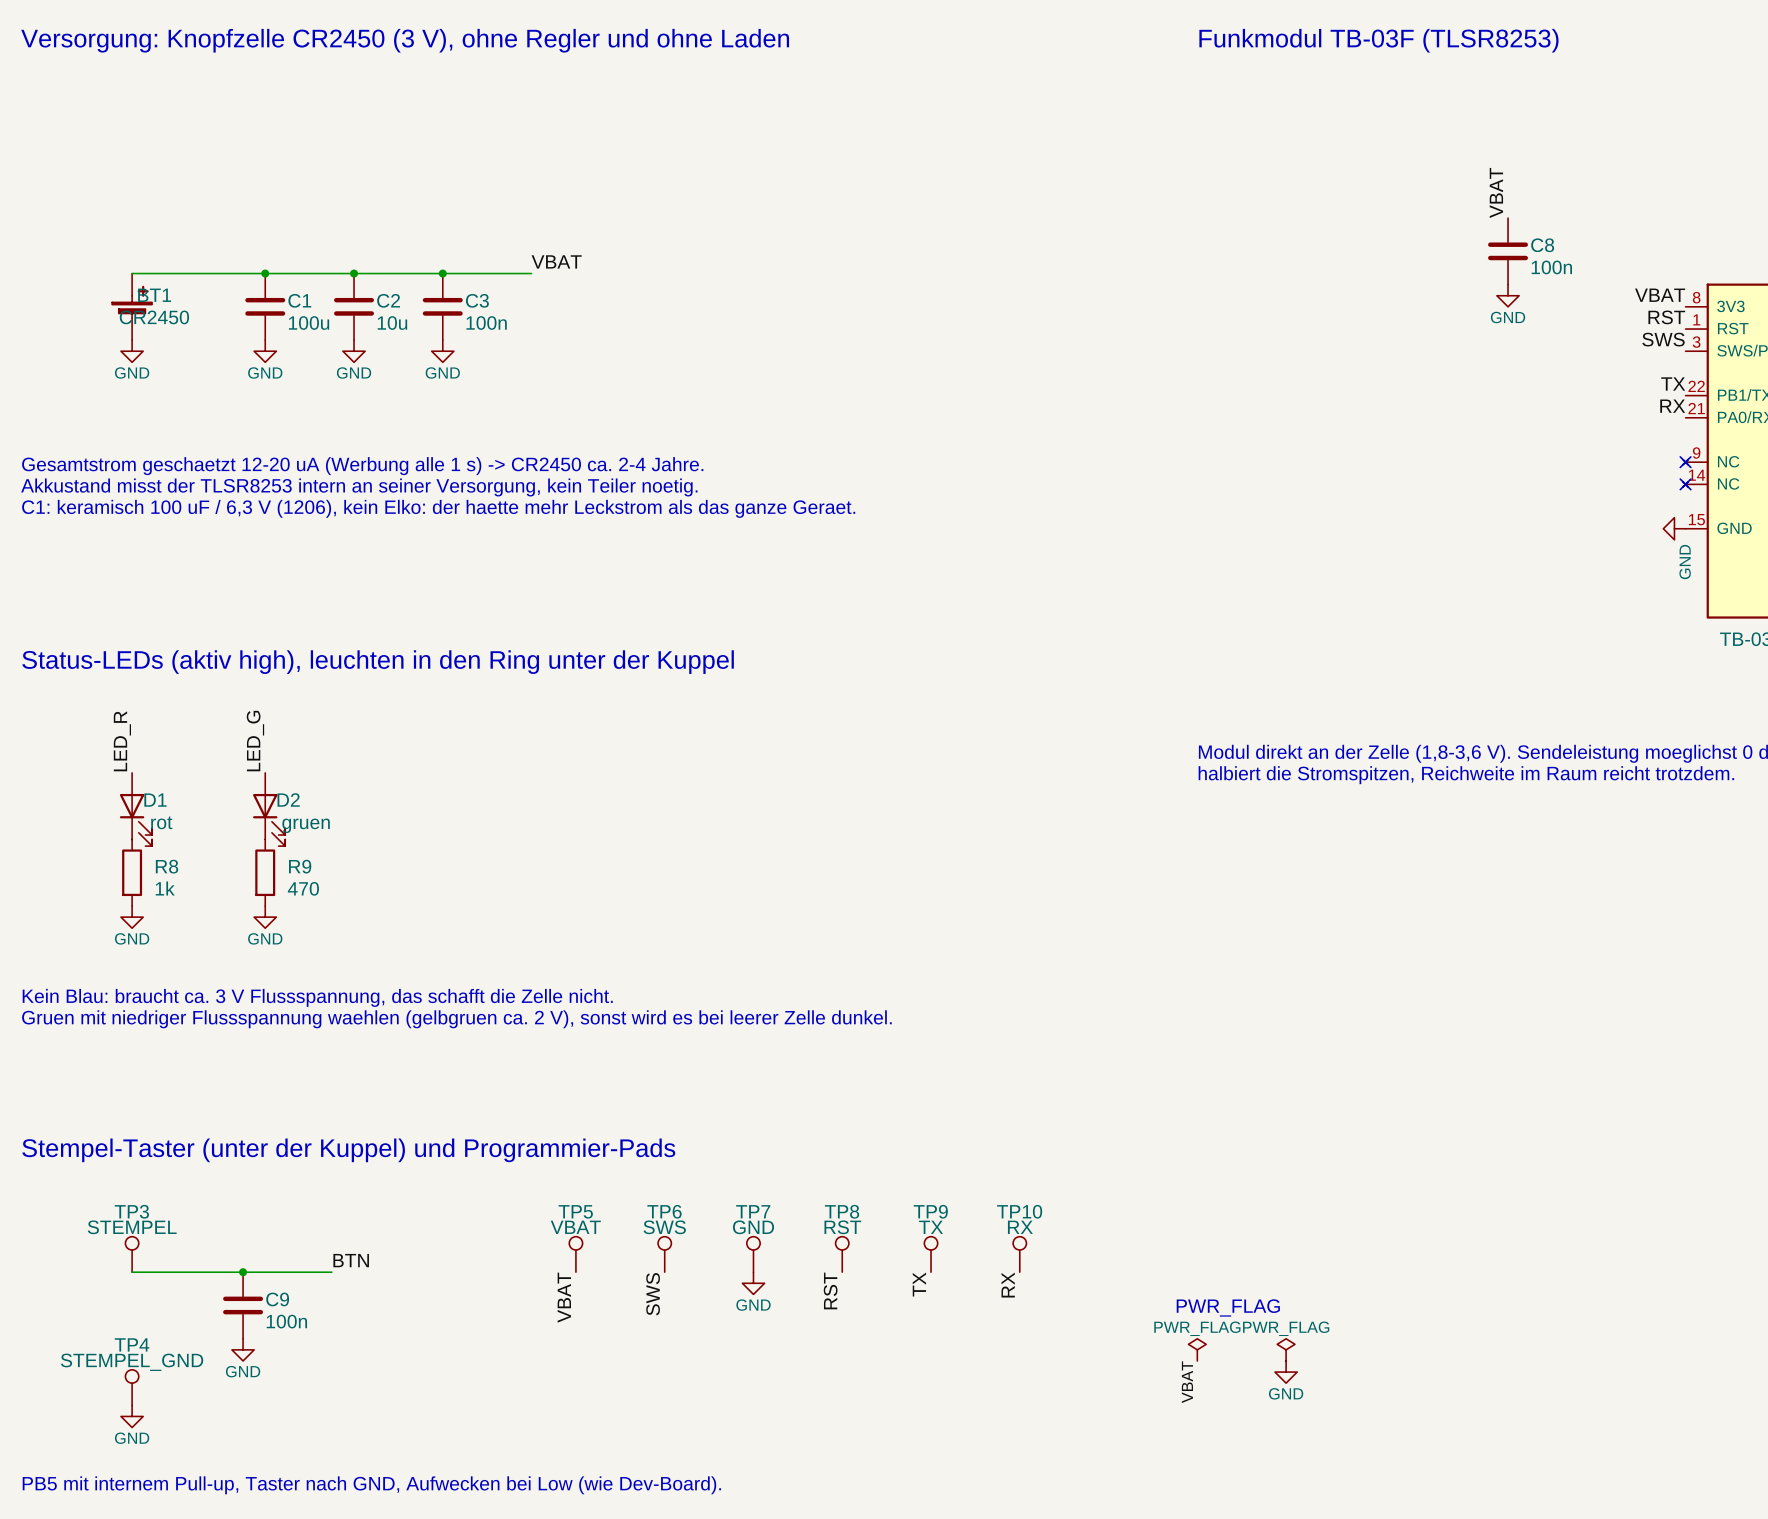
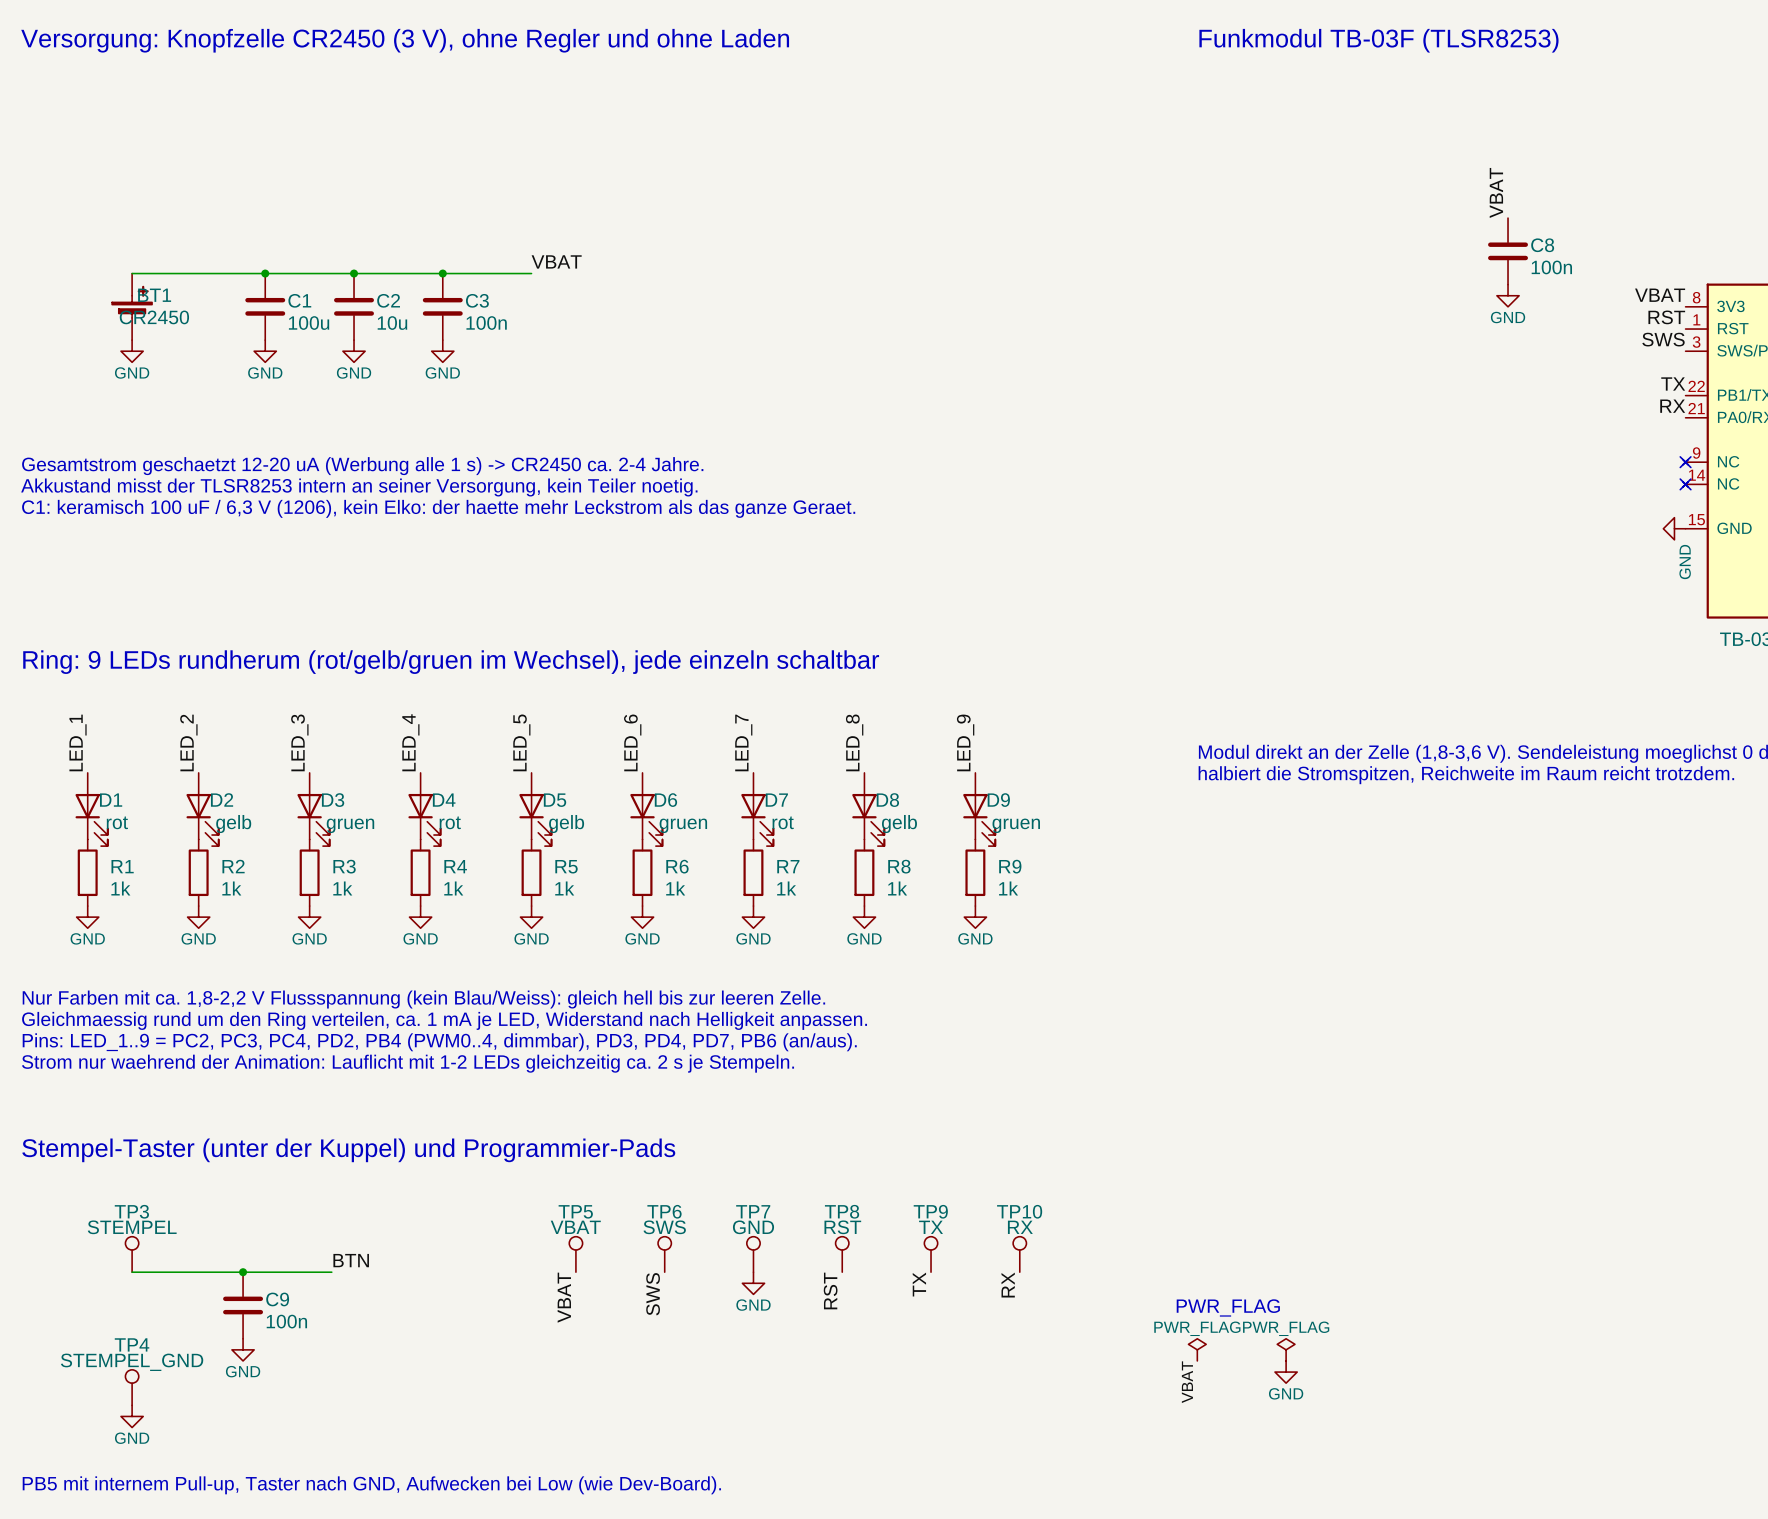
text: Status-LEDs (aktiv high), leuchten in den Ring unter der Kuppel (378, 662) -> Ring: 9 LEDs rundherum (rot/gelb/gruen im Wechsel), jede einzeln schaltbar (451, 662)
label: LED_R (122, 741) -> none
label: LED_G (255, 741) -> none
label: none -> LED_1 (78, 742)
label: none -> LED_2 (188, 742)
label: none -> LED_3 (299, 742)
label: none -> LED_4 (410, 742)
label: none -> LED_5 (521, 742)
label: none -> LED_6 (632, 742)
label: none -> LED_7 (743, 742)
label: none -> LED_8 (854, 742)
label: none -> LED_9 (965, 742)
D1 position: (135, 809) -> (91, 809)
D2 position: (269, 809) -> (202, 809)
D3: none -> gruen (313, 809)
D4: none -> rot (424, 809)
D5: none -> gelb (535, 809)
D6: none -> gruen (646, 809)
D7: none -> rot (757, 809)
D8: none -> gelb (868, 809)
D9: none -> gruen (979, 809)
D2 value: gruen (306, 825) -> gelb (233, 824)
R1: none -> 1k (87, 872)
R8 position: (132, 872) -> (864, 872)
R2: none -> 1k (198, 872)
R9 position: (265, 872) -> (975, 872)
R3: none -> 1k (309, 872)
R4: none -> 1k (420, 872)
R5: none -> 1k (531, 872)
R6: none -> 1k (642, 872)
R7: none -> 1k (753, 872)
R9 value: 470 (303, 888) -> 1k (1008, 888)
power symbol: none -> GND (87, 917)
power symbol: GND (132, 917) -> none
power symbol: none -> GND (198, 917)
power symbol: GND (265, 917) -> none
power symbol: none -> GND (309, 917)
power symbol: none -> GND (420, 917)
power symbol: none -> GND (531, 917)
power symbol: none -> GND (642, 917)
power symbol: none -> GND (753, 917)
power symbol: none -> GND (864, 917)
power symbol: none -> GND (975, 917)
text: Kein Blau: braucht ca. 3 V Flussspannung, das schafft die Zelle nicht. (317, 997) -> Nur Farben mit ca. 1,8-2,2 V Flussspannung (kein Blau/Weiss): gleich hell bis zur leeren Zelle. (423, 999)
text: Gruen mit niedriger Flussspannung waehlen (gelbgruen ca. 2 V), sonst wird es bei leerer Zelle dunkel. (456, 1019) -> Gleichmaessig rund um den Ring verteilen, ca. 1 mA je LED, Widerstand nach Helligkeit anpassen. (444, 1020)
text: none -> Pins: LED_1..9 = PC2, PC3, PC4, PD2, PB4 (PWM0..4, dimmbar), PD3, PD4, PD7, PB6 (an/aus). (439, 1042)
text: none -> Strom nur waehrend der Animation: Lauflicht mit 1-2 LEDs gleichzeitig ca. 2 s je Stempeln. (408, 1063)

